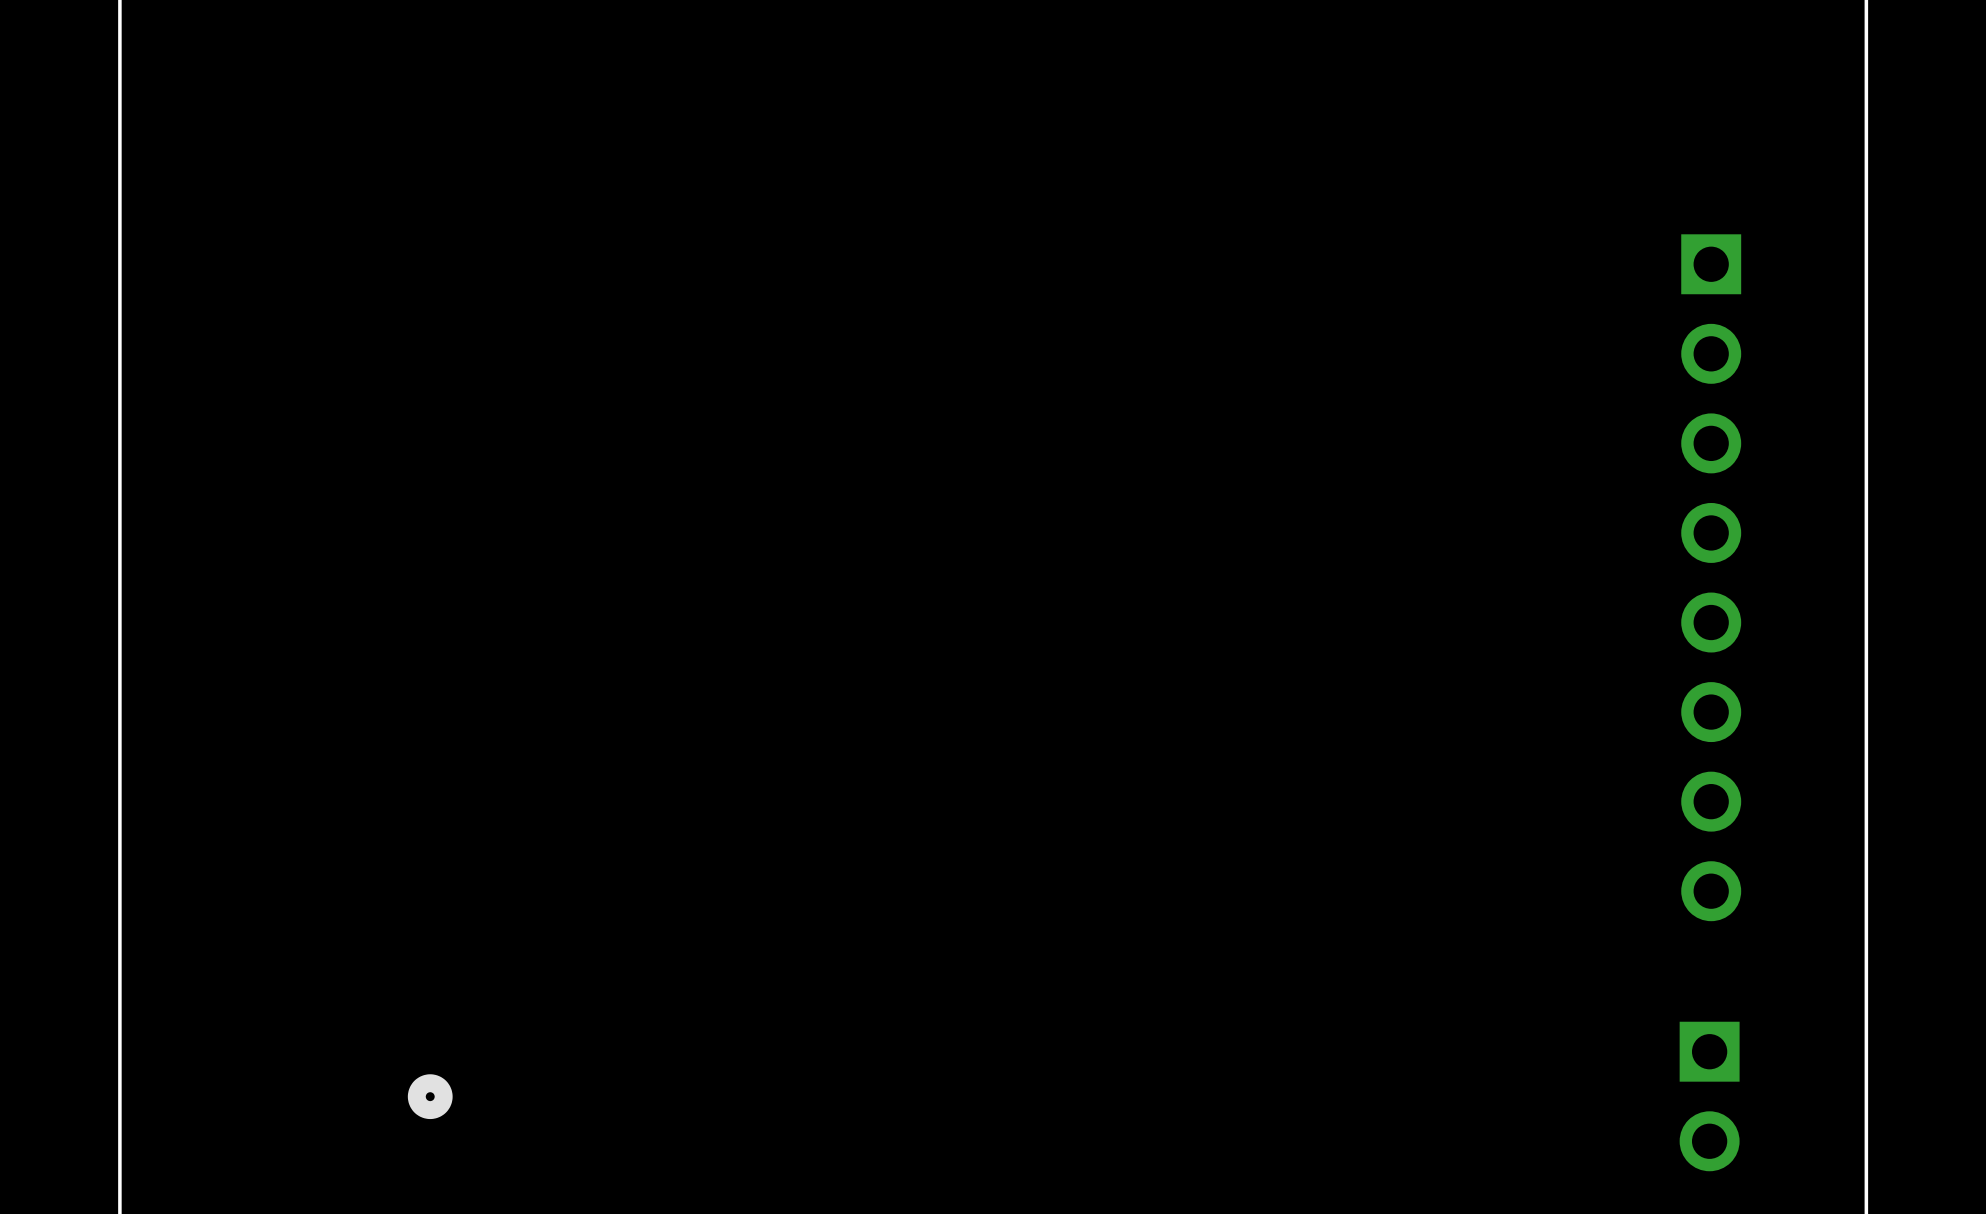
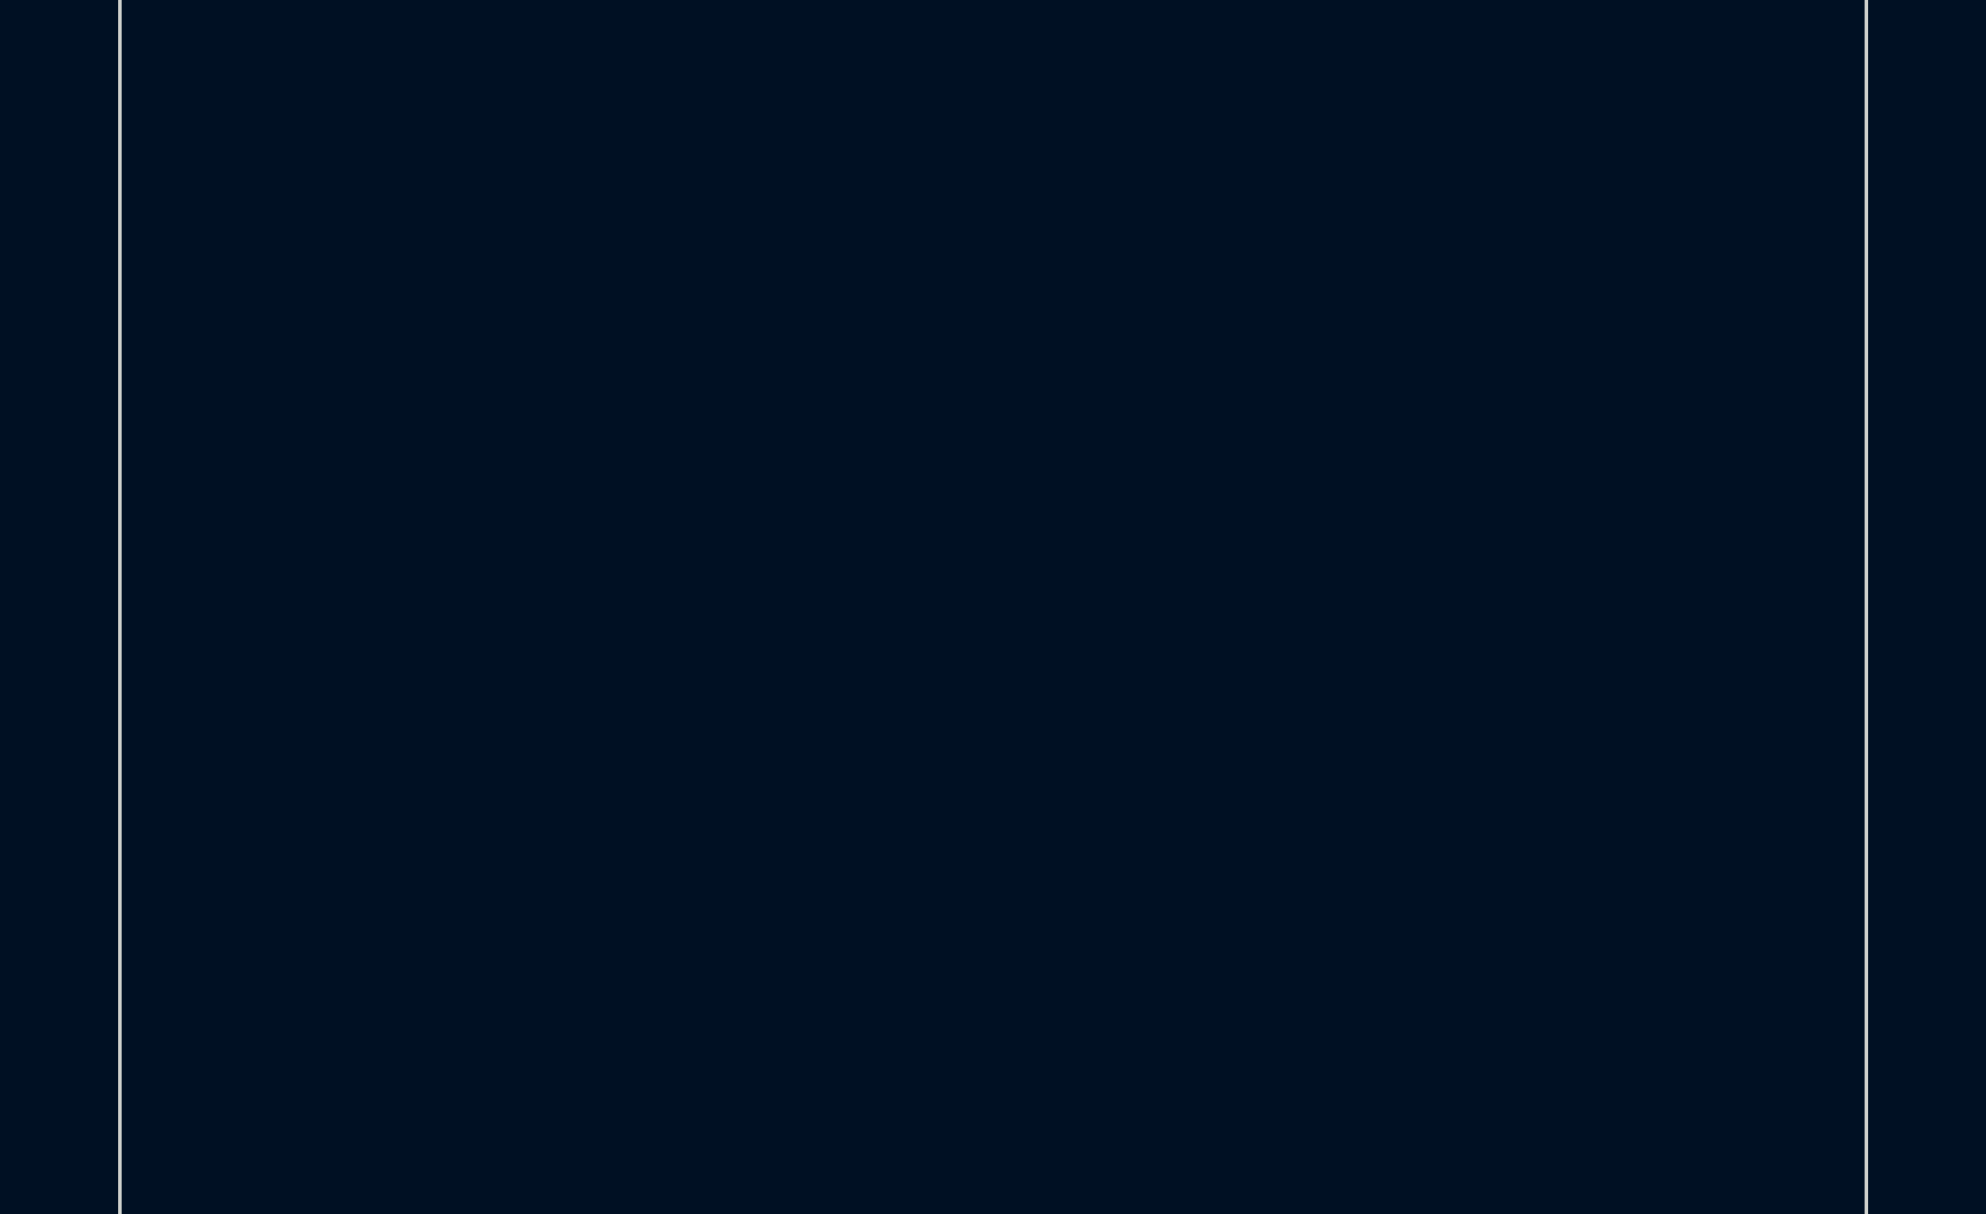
part: (1711, 577) -> none
part: (430, 1096) -> none
part: (1709, 1096) -> none

